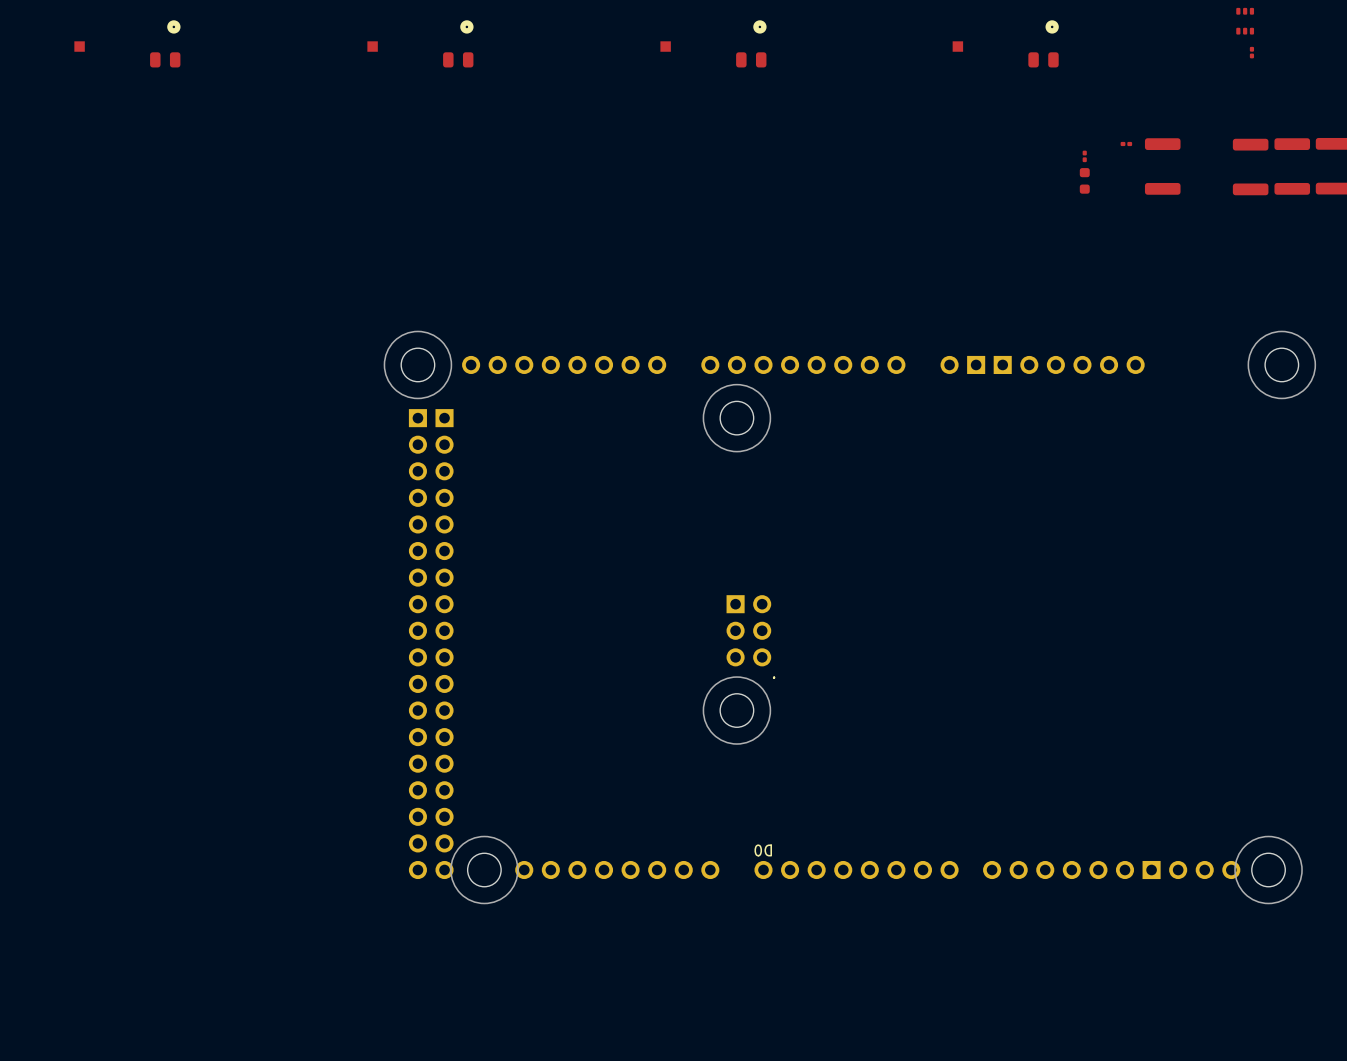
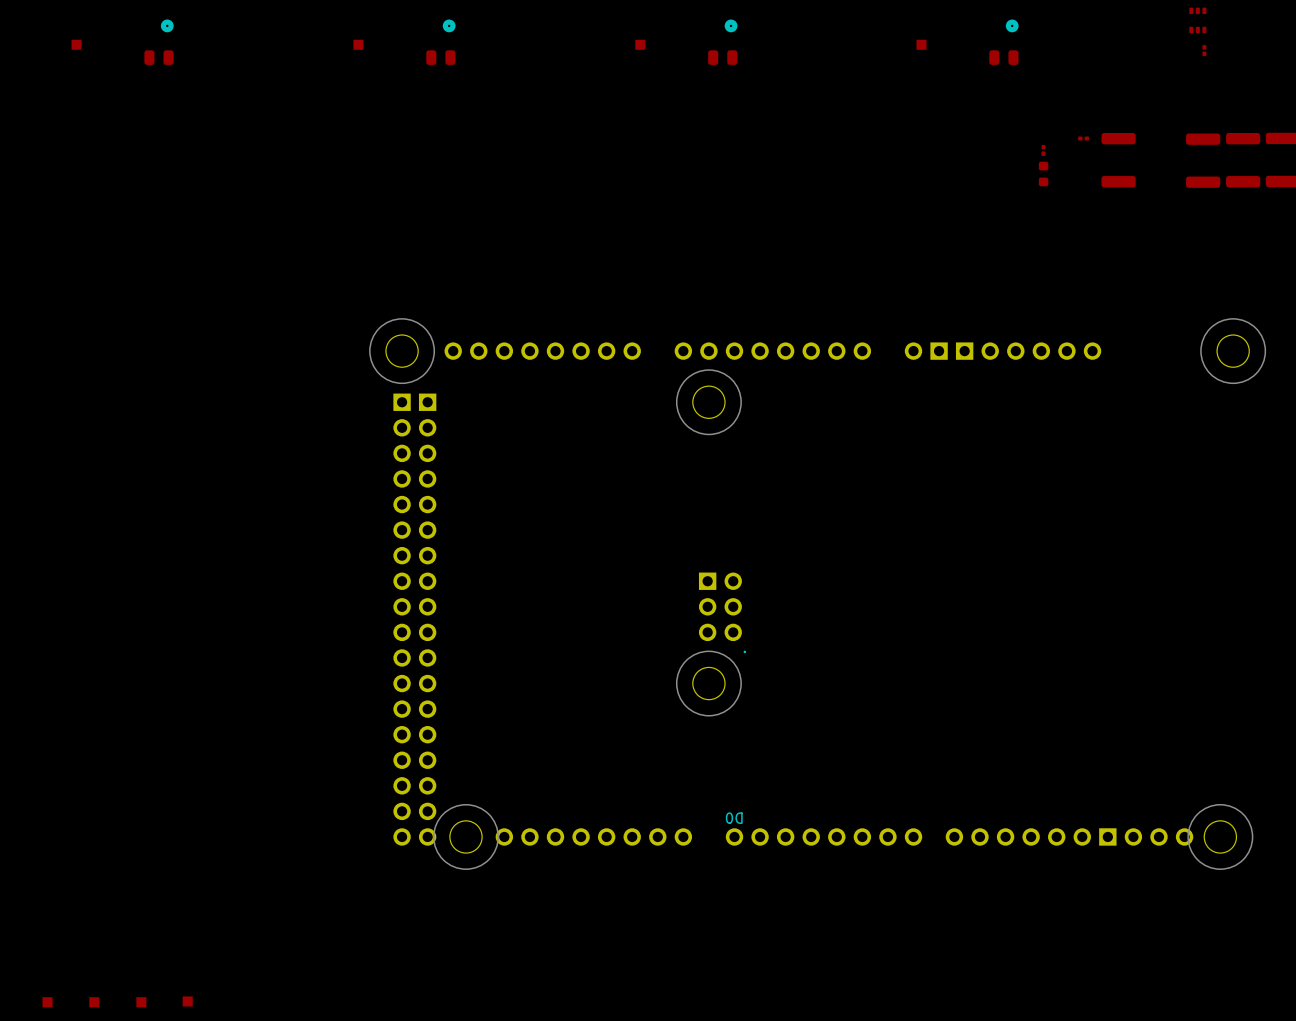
part: none -> (47, 1002)
part: none -> (94, 1002)
part: none -> (141, 1002)
part: none -> (187, 1001)

